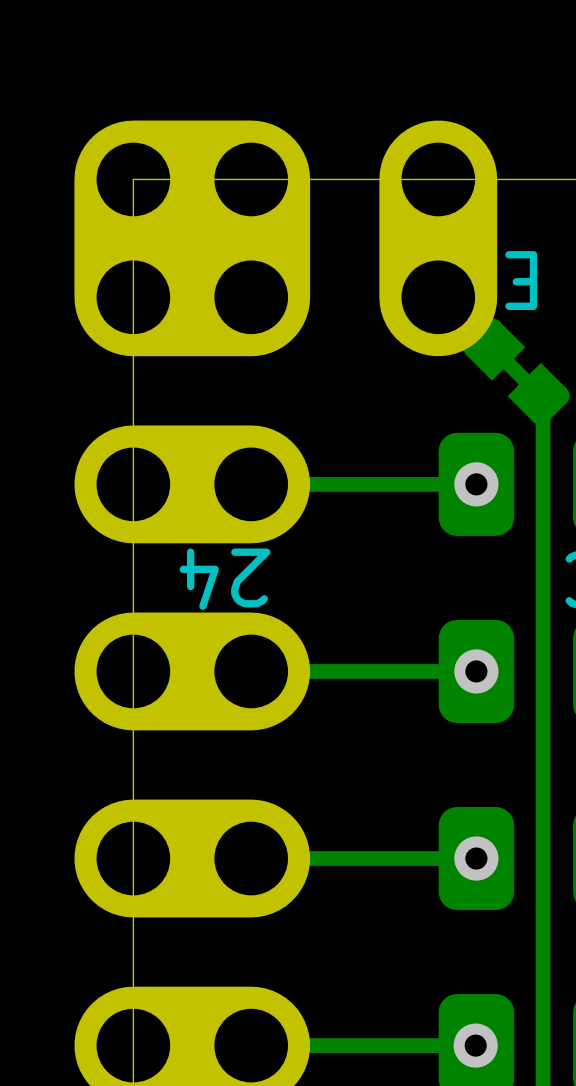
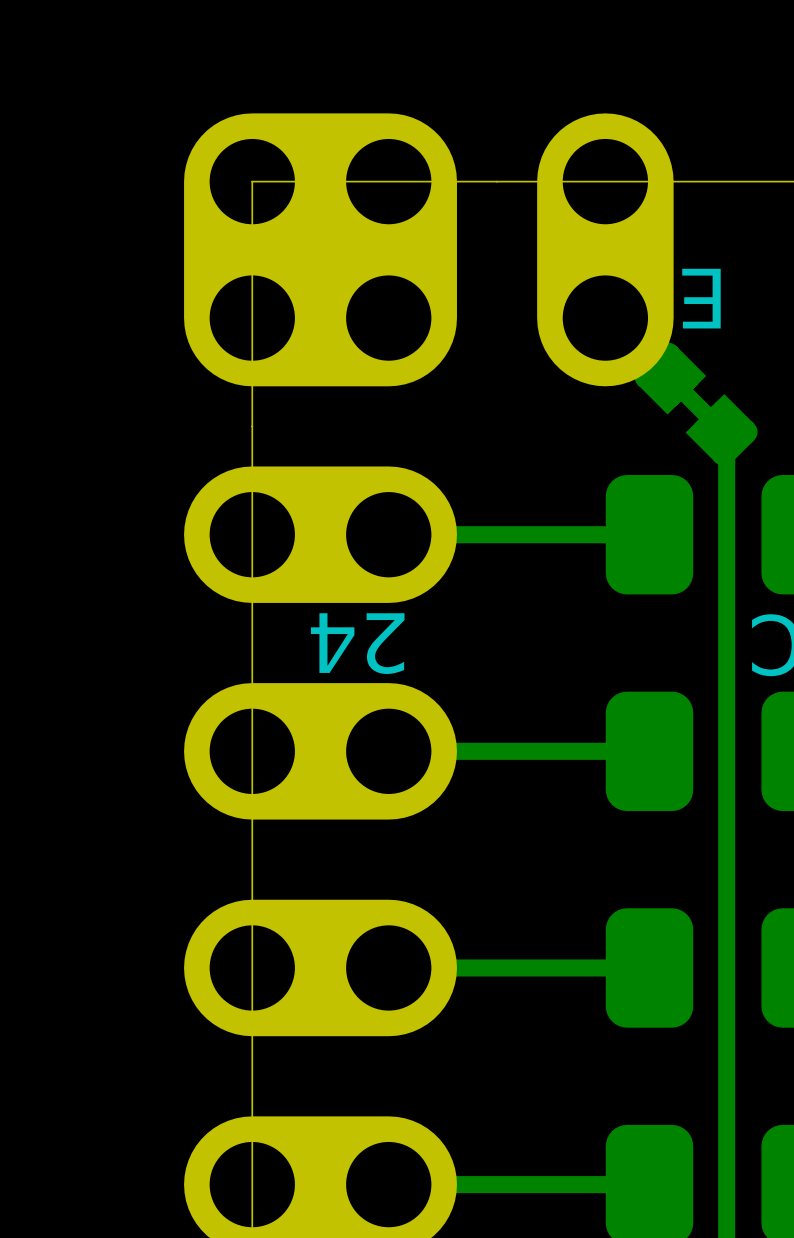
via: (476, 484) -> none
via: (476, 671) -> none
via: (476, 858) -> none
via: (475, 1045) -> none

